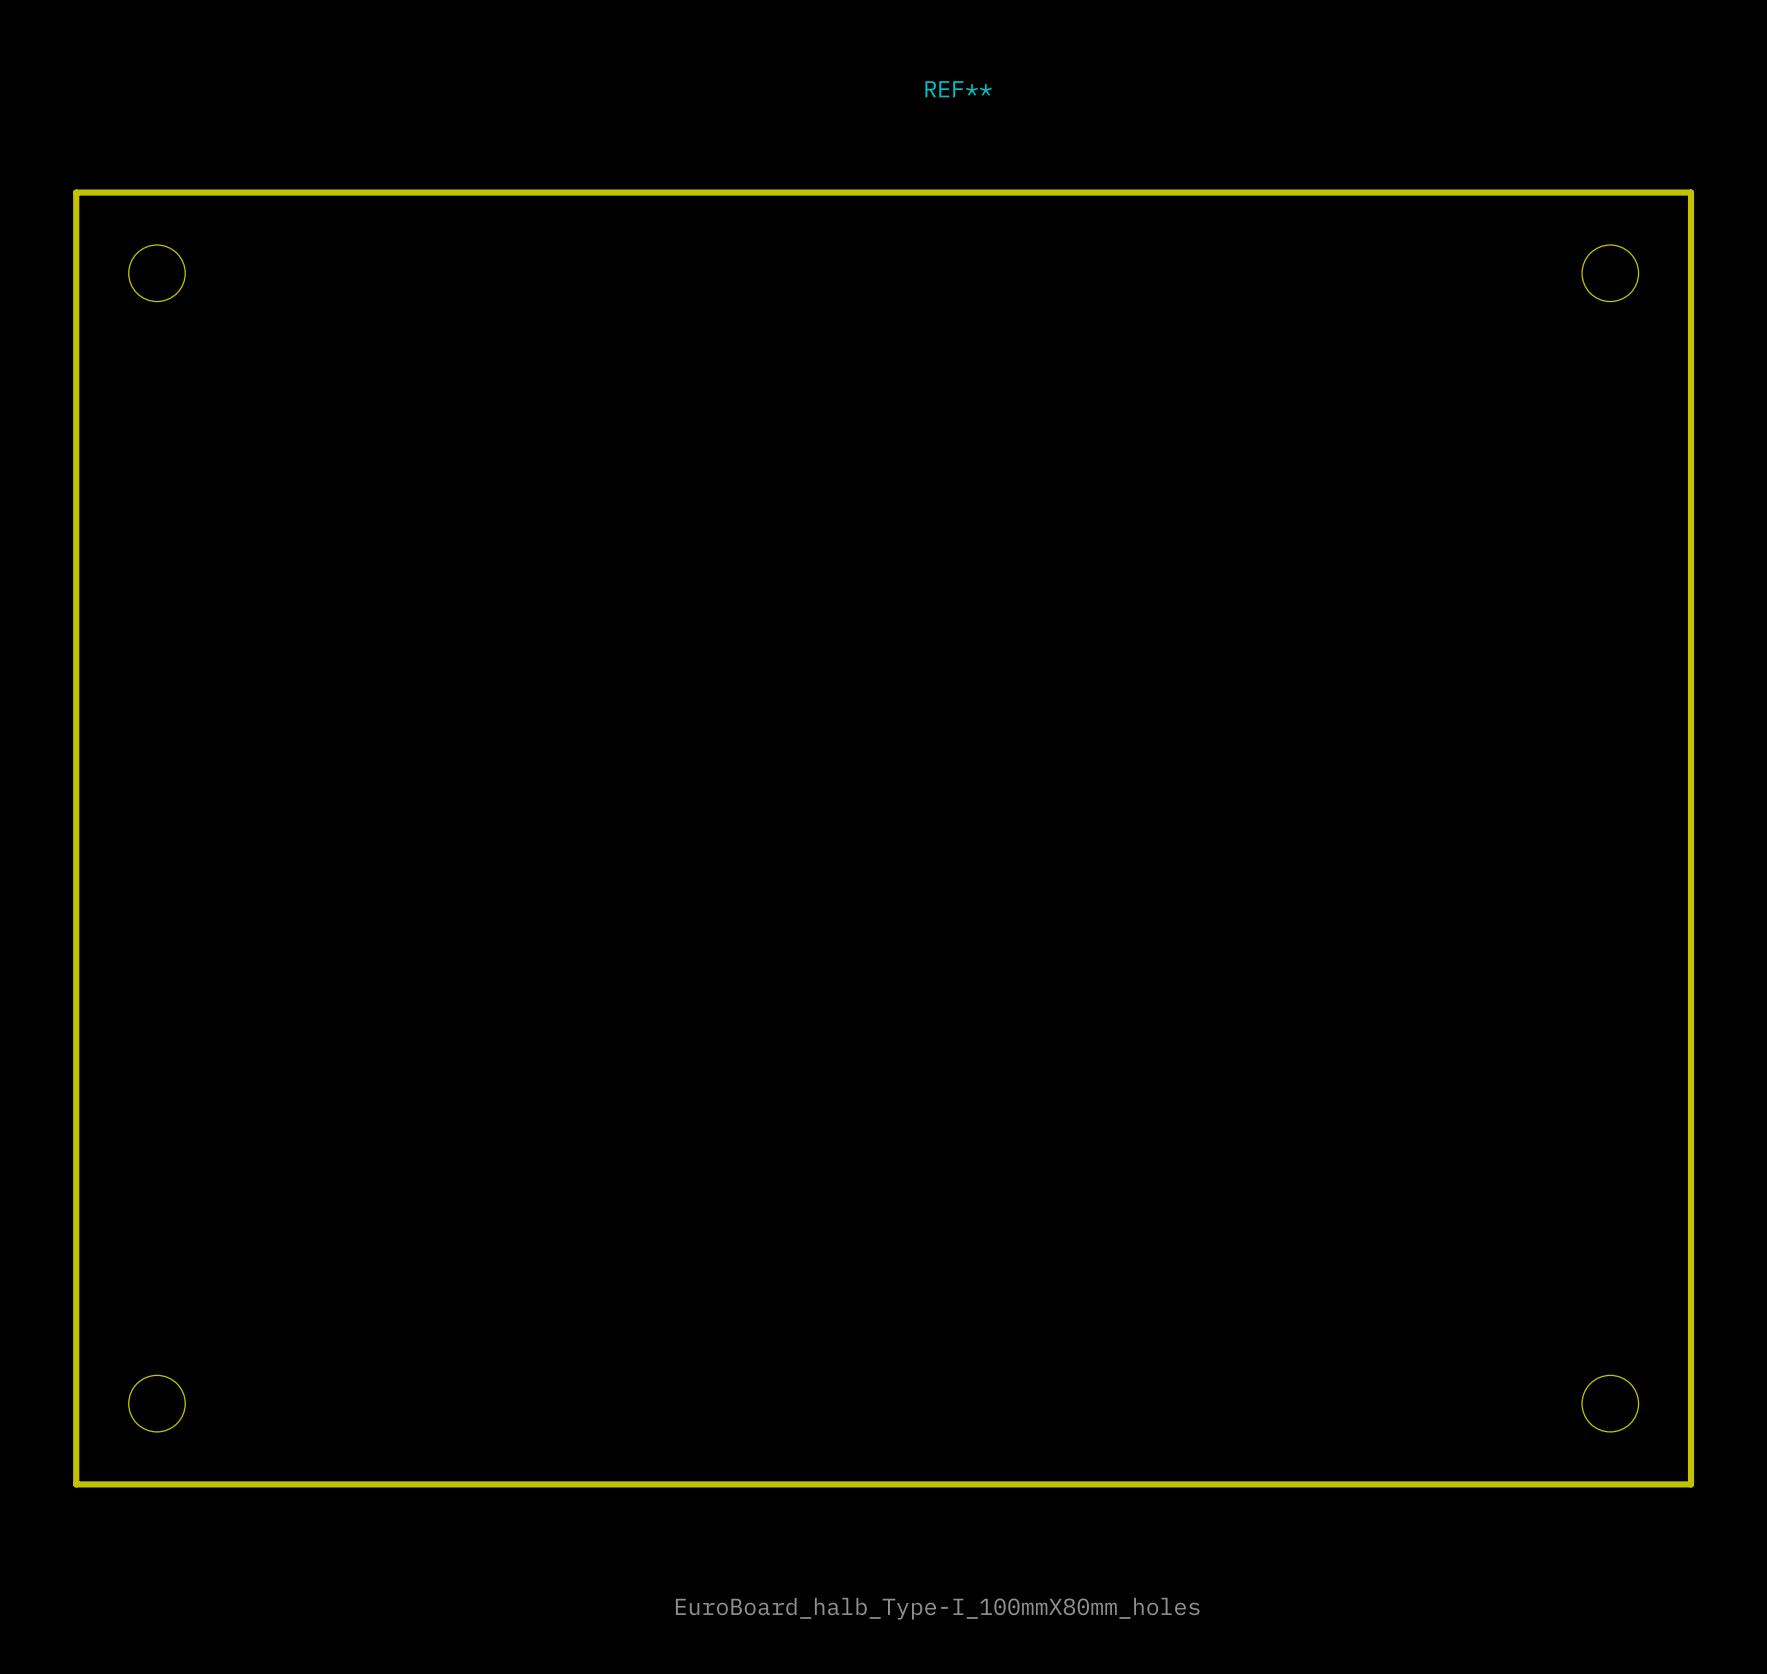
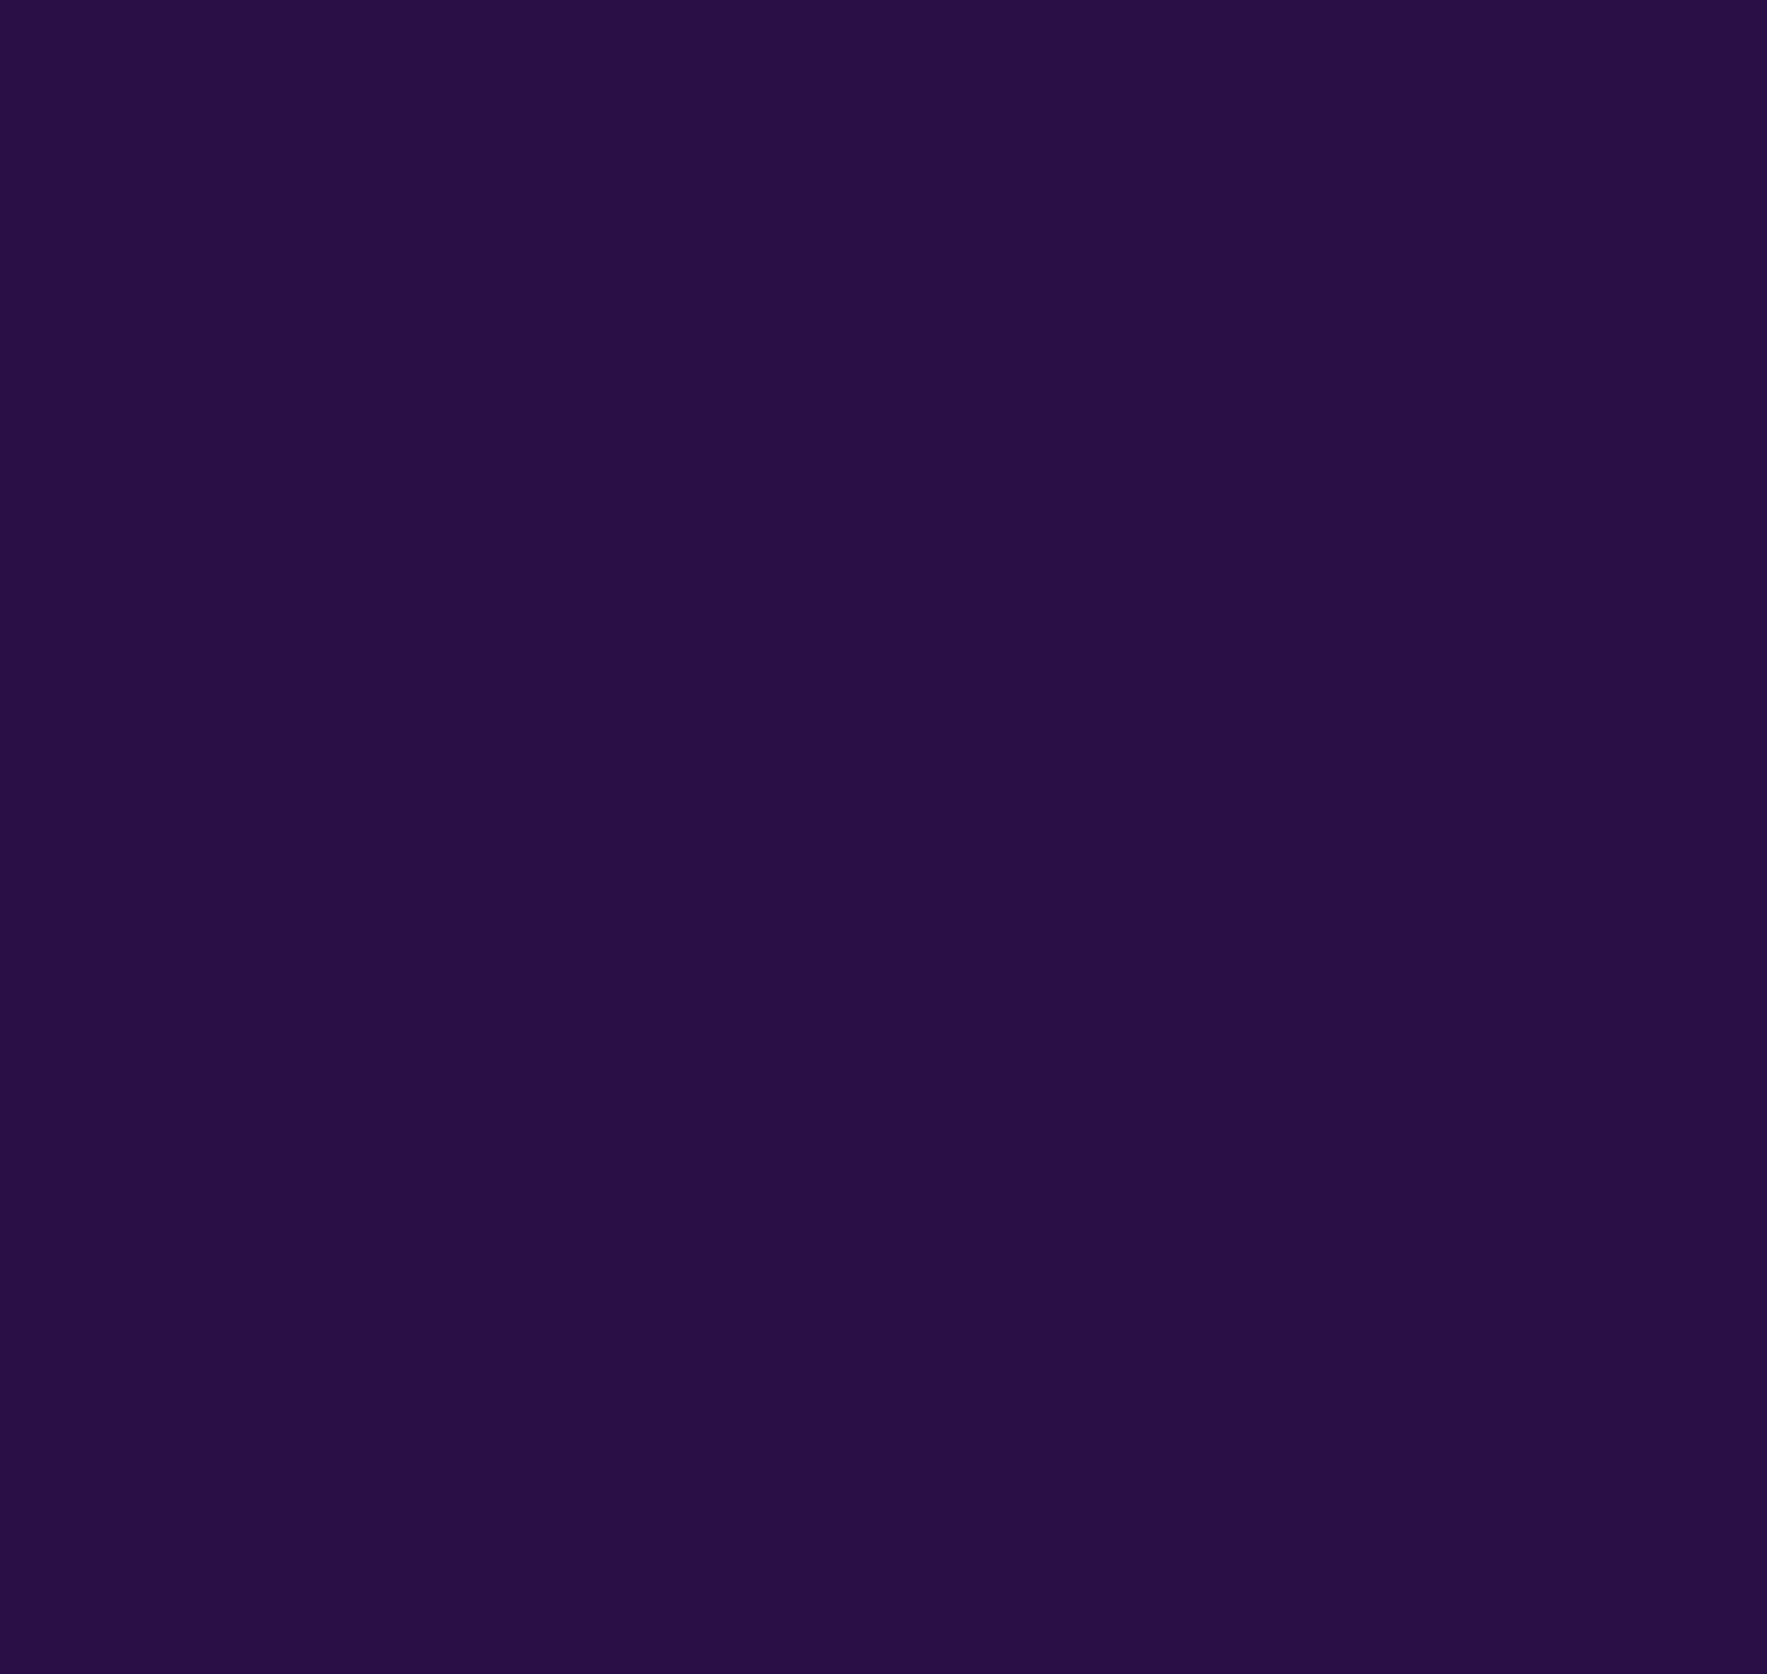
REF**: EuroBoard_halb_Type-I_100mmX80mm_holes (883, 838) -> none

